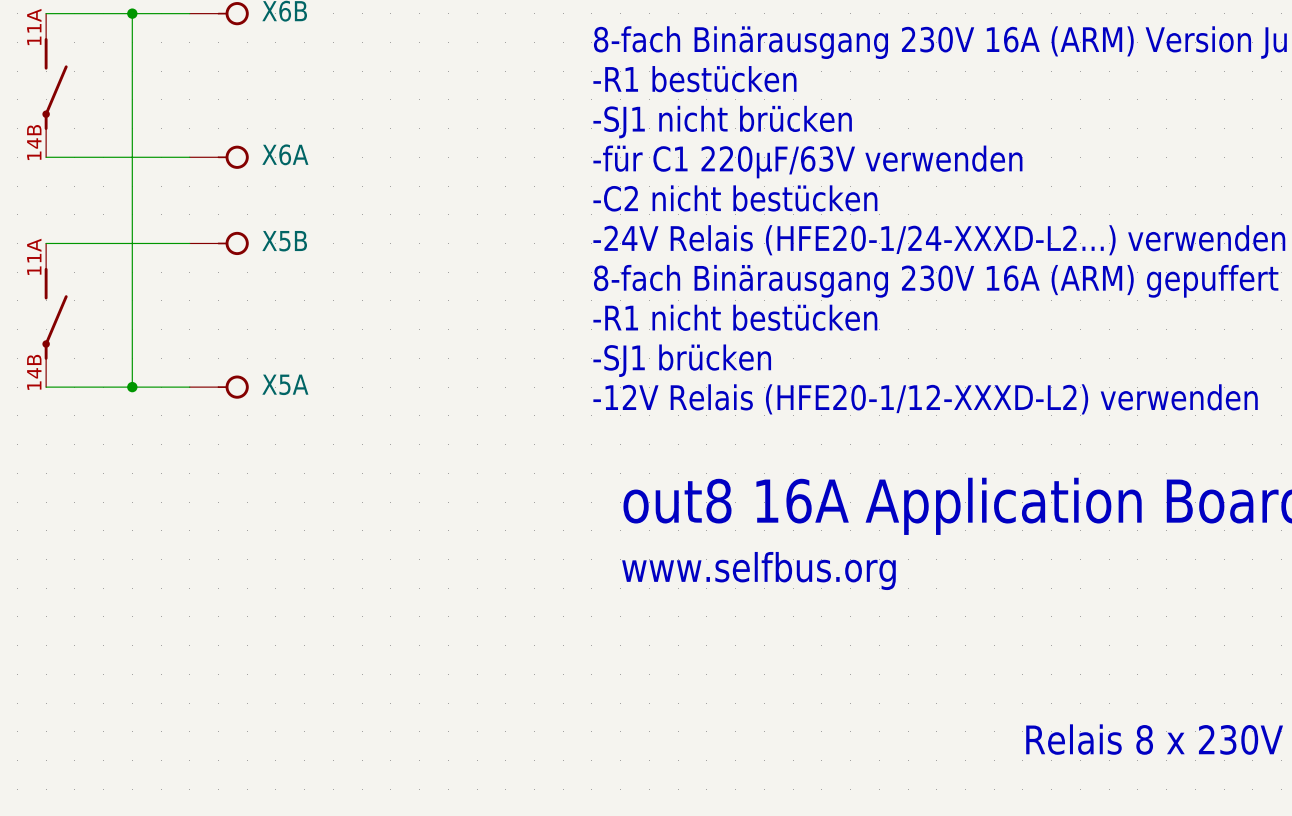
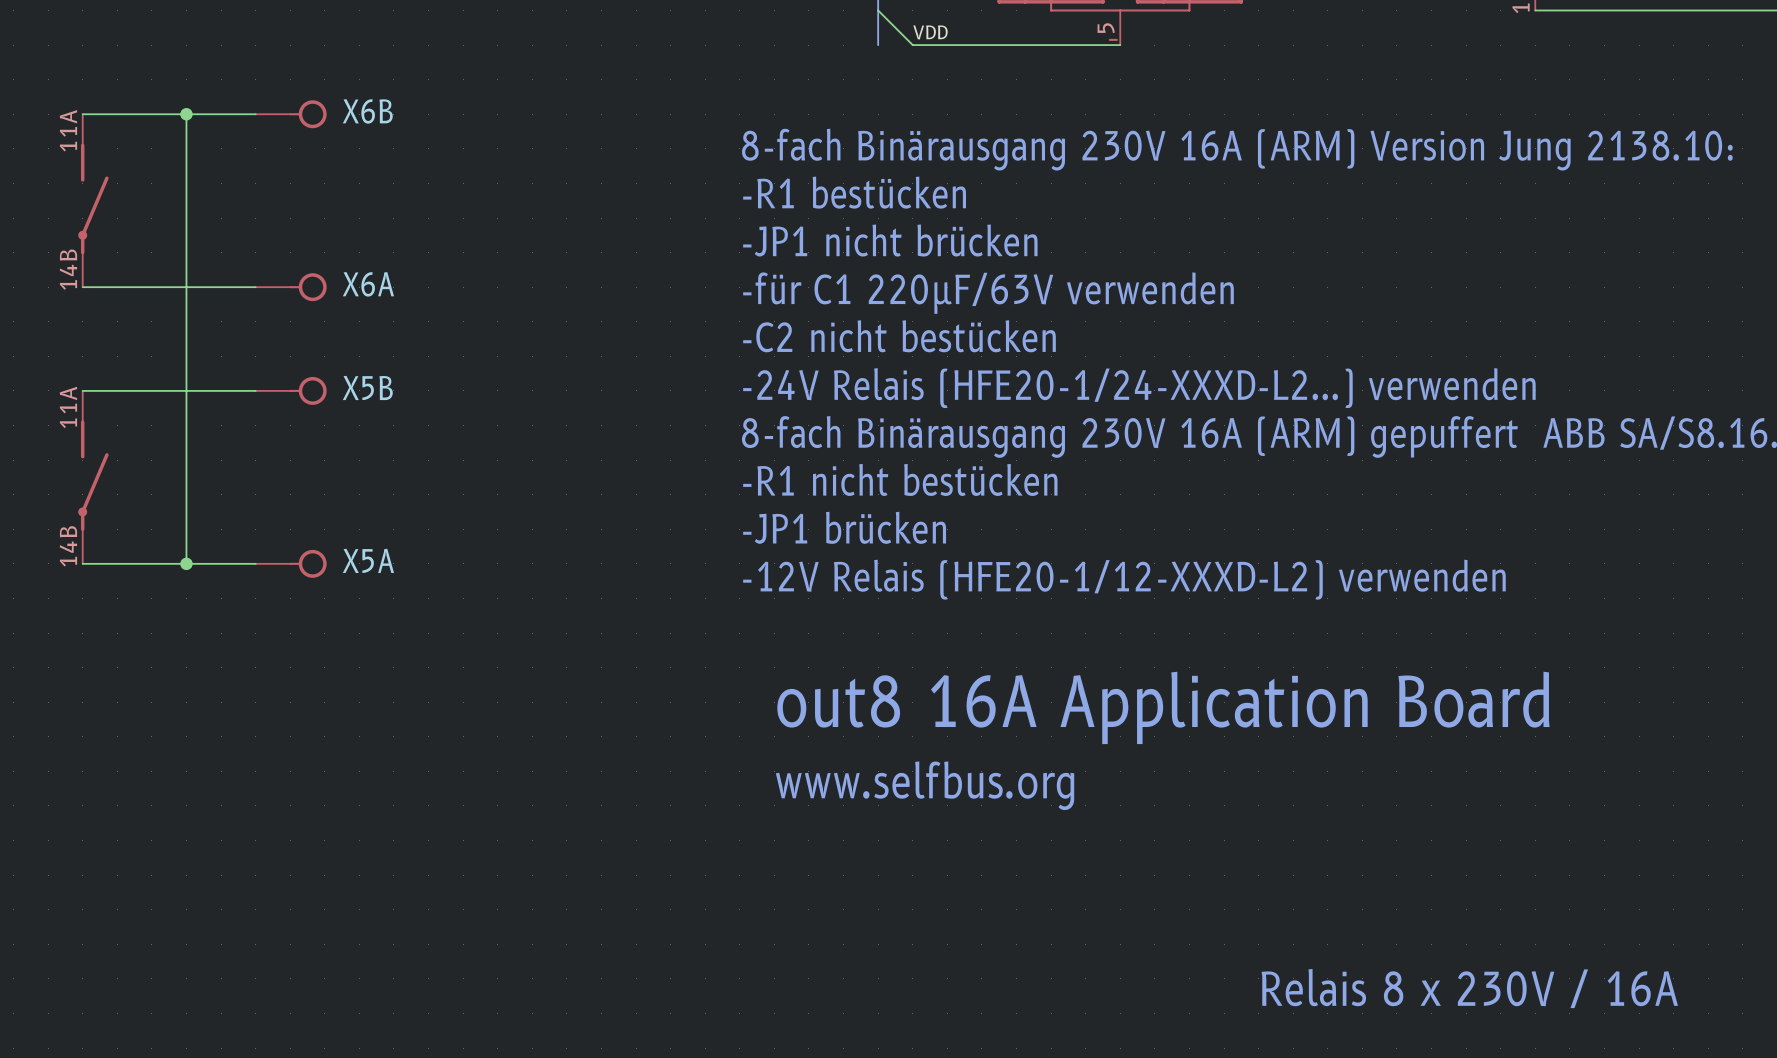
text: -SJ1 nicht brücken (722, 122) -> -JP1 nicht brücken (890, 240)
text: -SJ1 brücken (682, 360) -> -JP1 brücken (844, 527)

